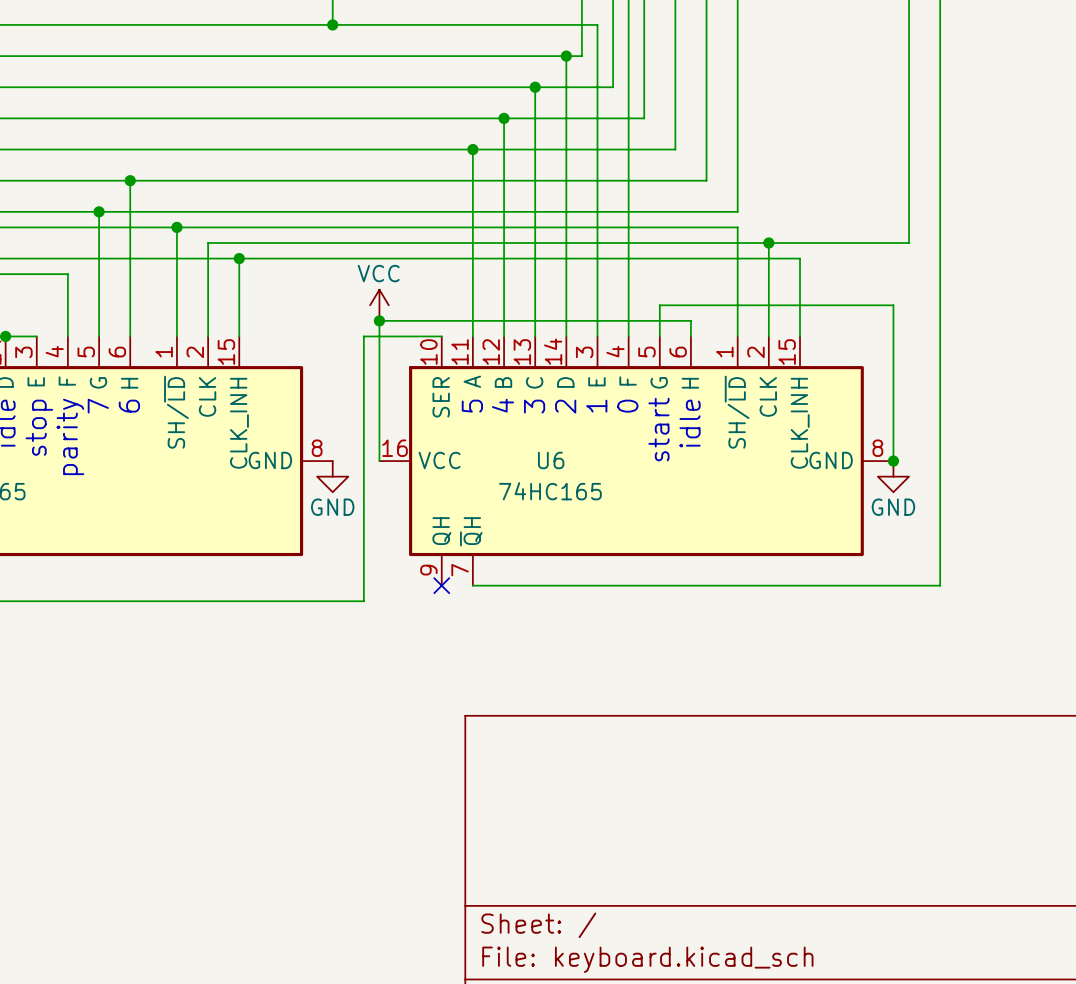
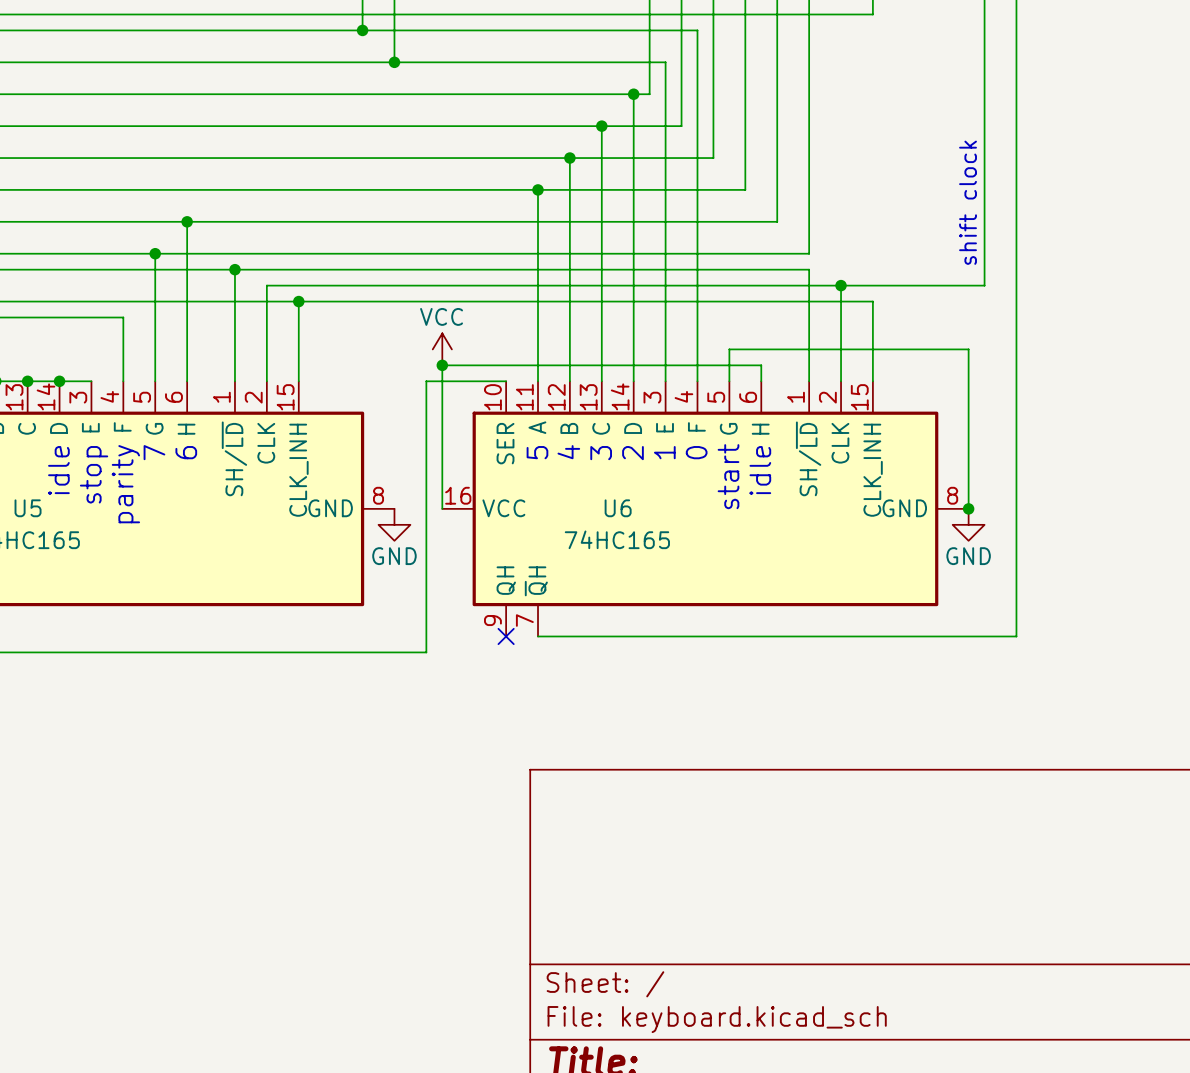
text: none -> shift clock (968, 202)

